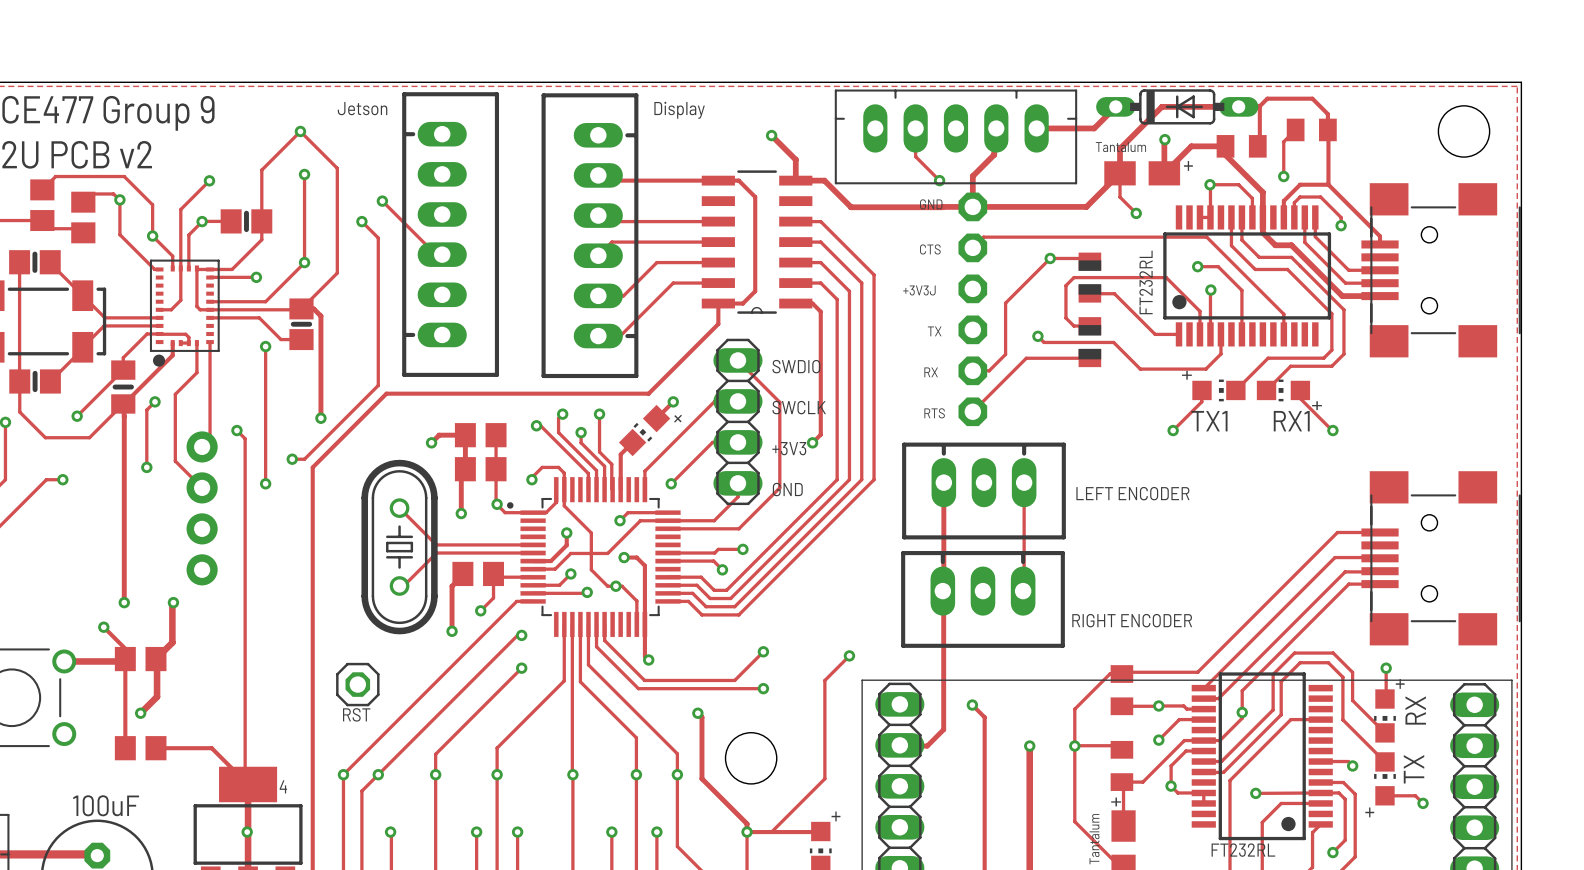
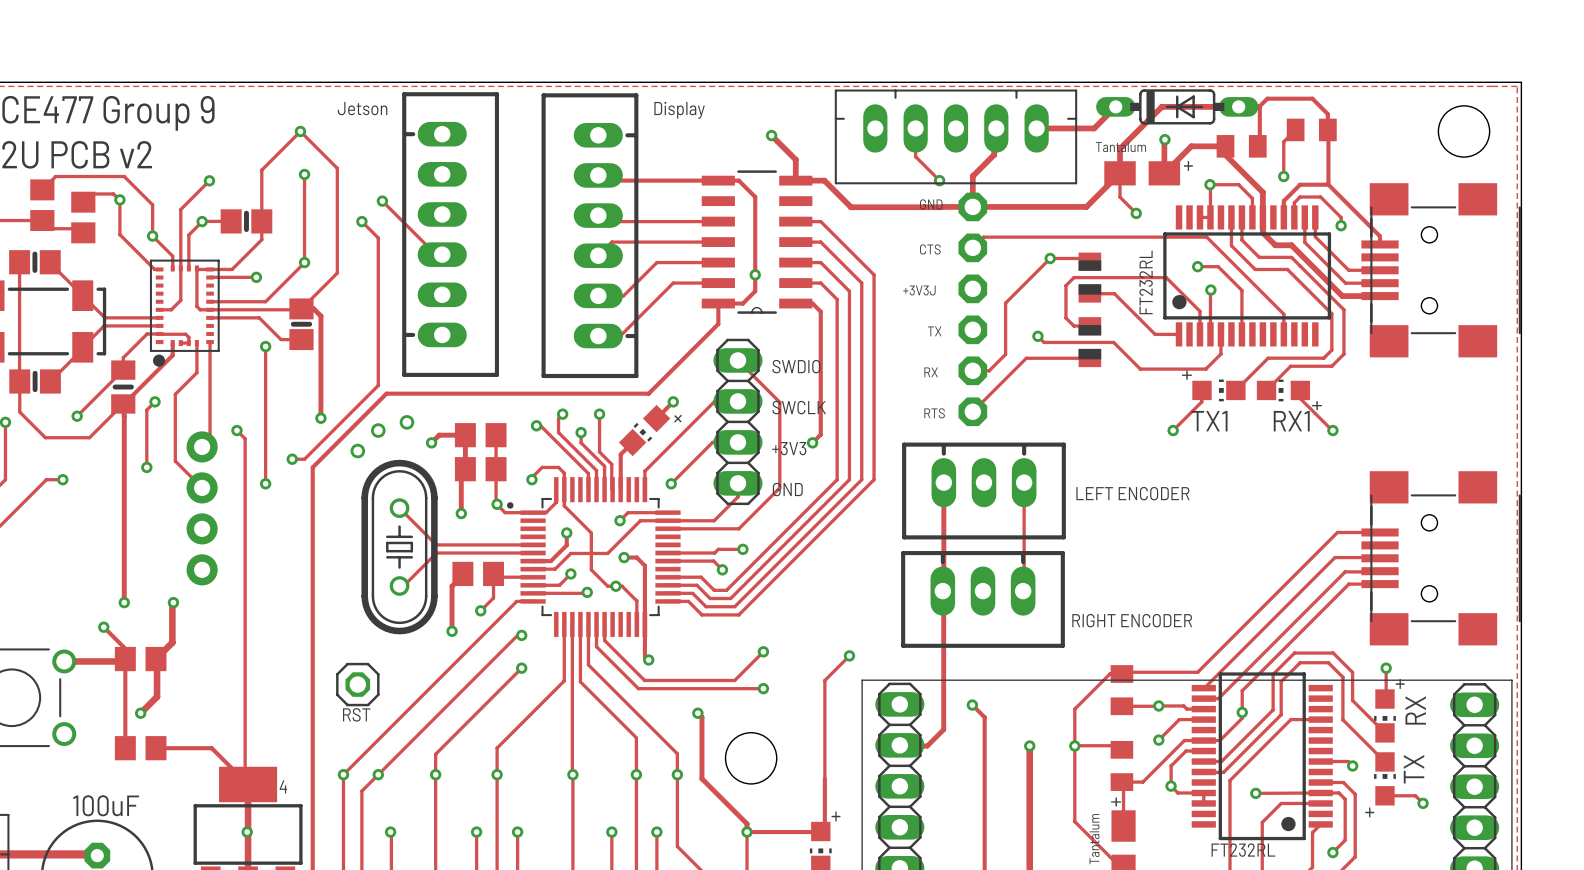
via: none -> (755, 274)
via: none -> (406, 422)
via: none -> (378, 430)
via: none -> (357, 451)
track: (824, 778) (771, 832) (747, 832) -> (824, 778) (824, 827) (820, 831)

